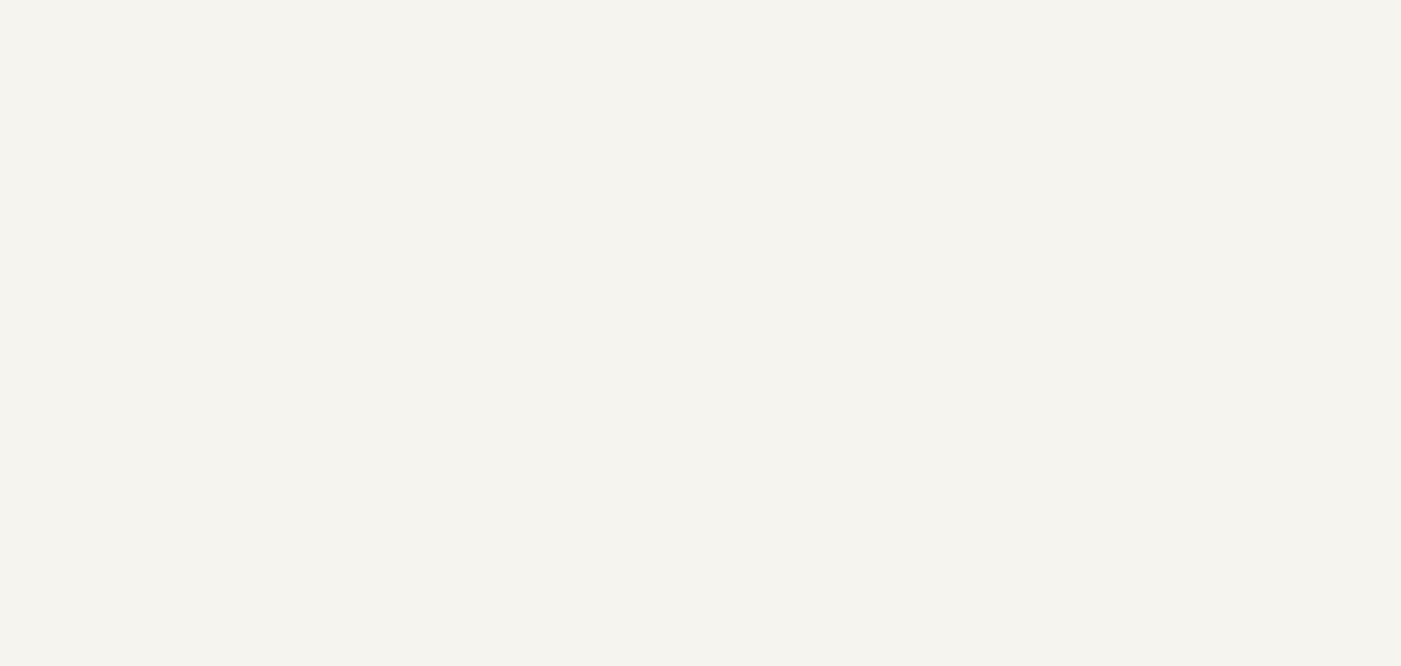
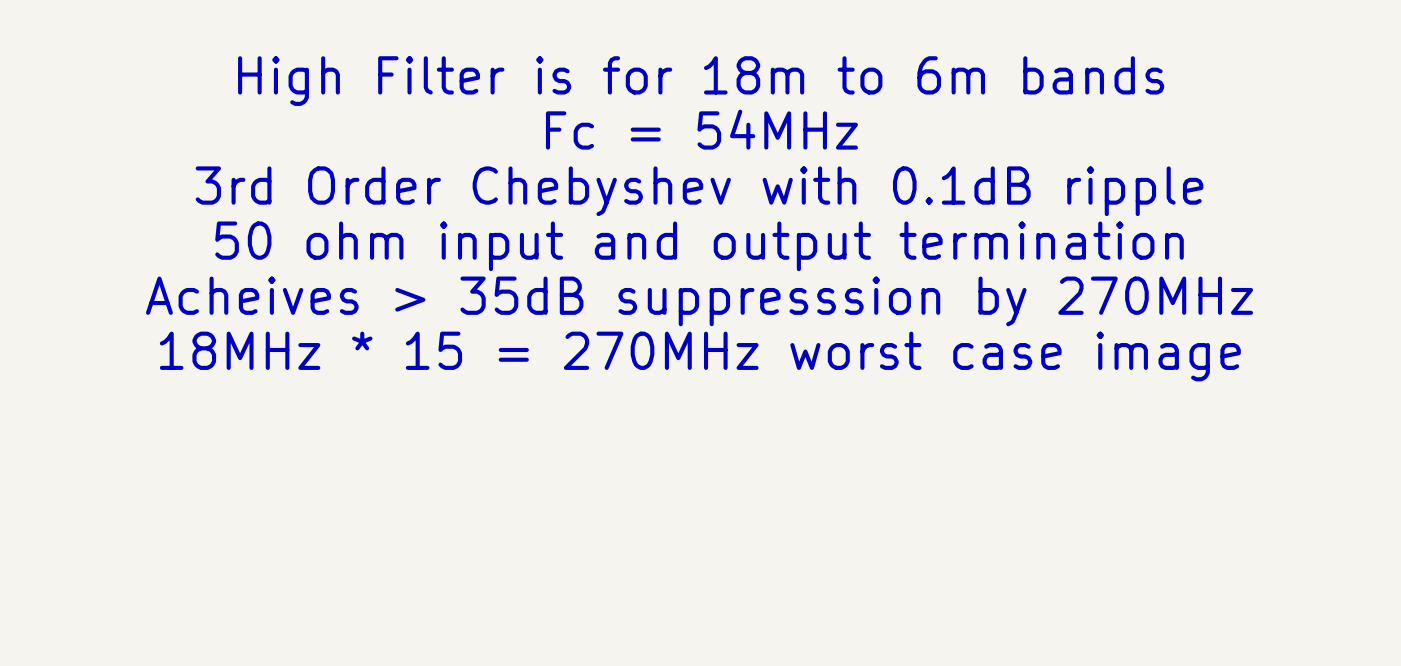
text: none -> High Filter is for 18m to 6m bands (701, 81)
text: none -> Fc = 54MHz (701, 129)
text: none -> 3rd Order Chebyshev with 0.1dB ripple (699, 191)
text: none -> 50 ohm input and output termination (699, 246)
text: none -> Acheives > 35dB suppresssion by 270MHz (699, 301)
text: none -> 18MHz * 15 = 270MHz worst case image (700, 356)

